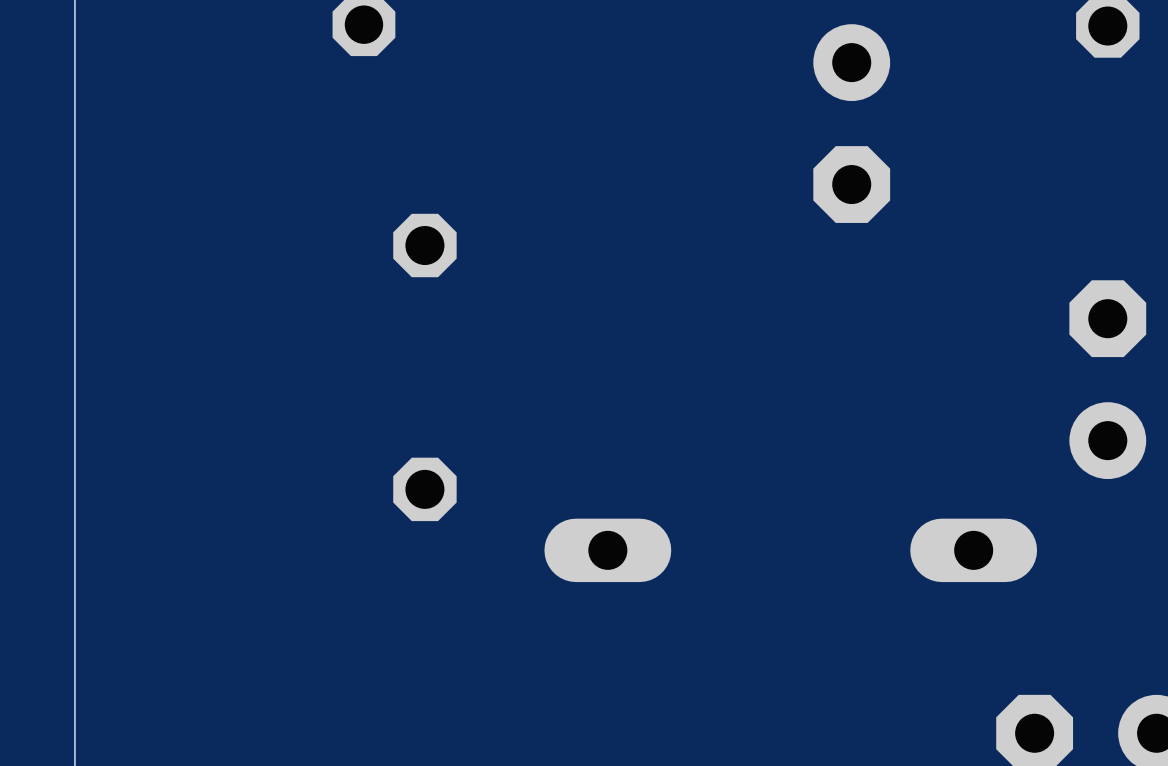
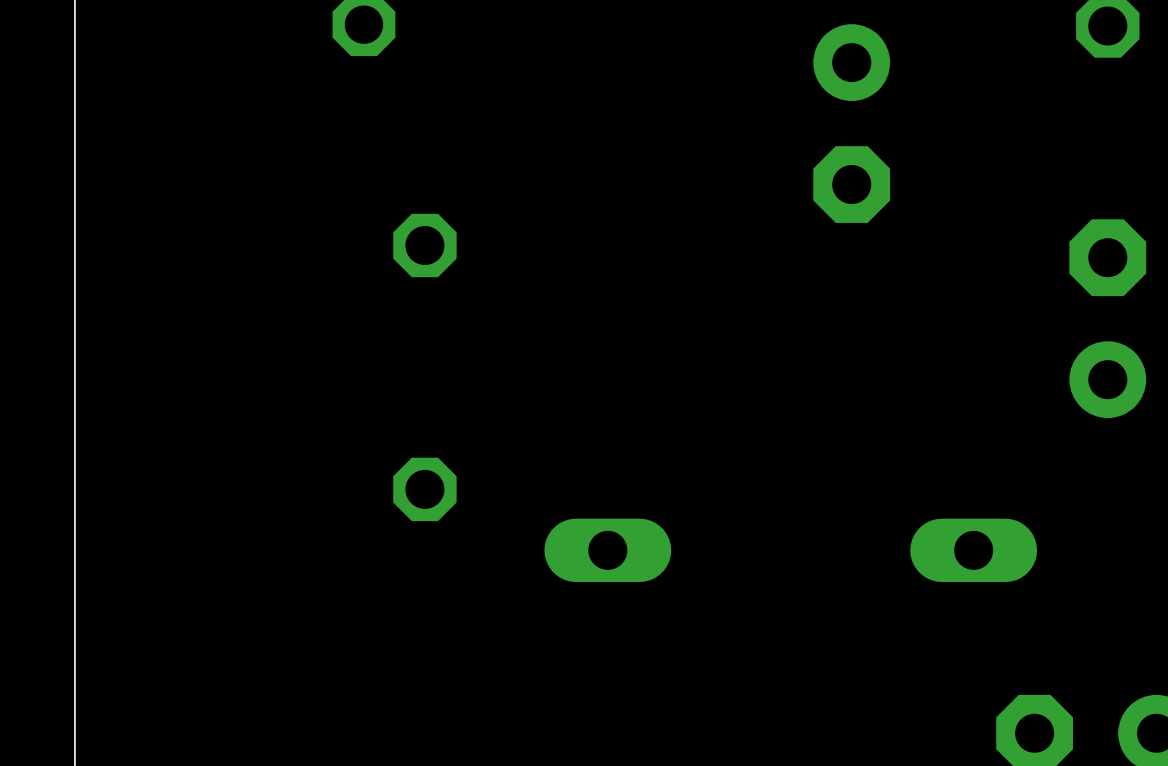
part position: (1107, 379) -> (1107, 318)

